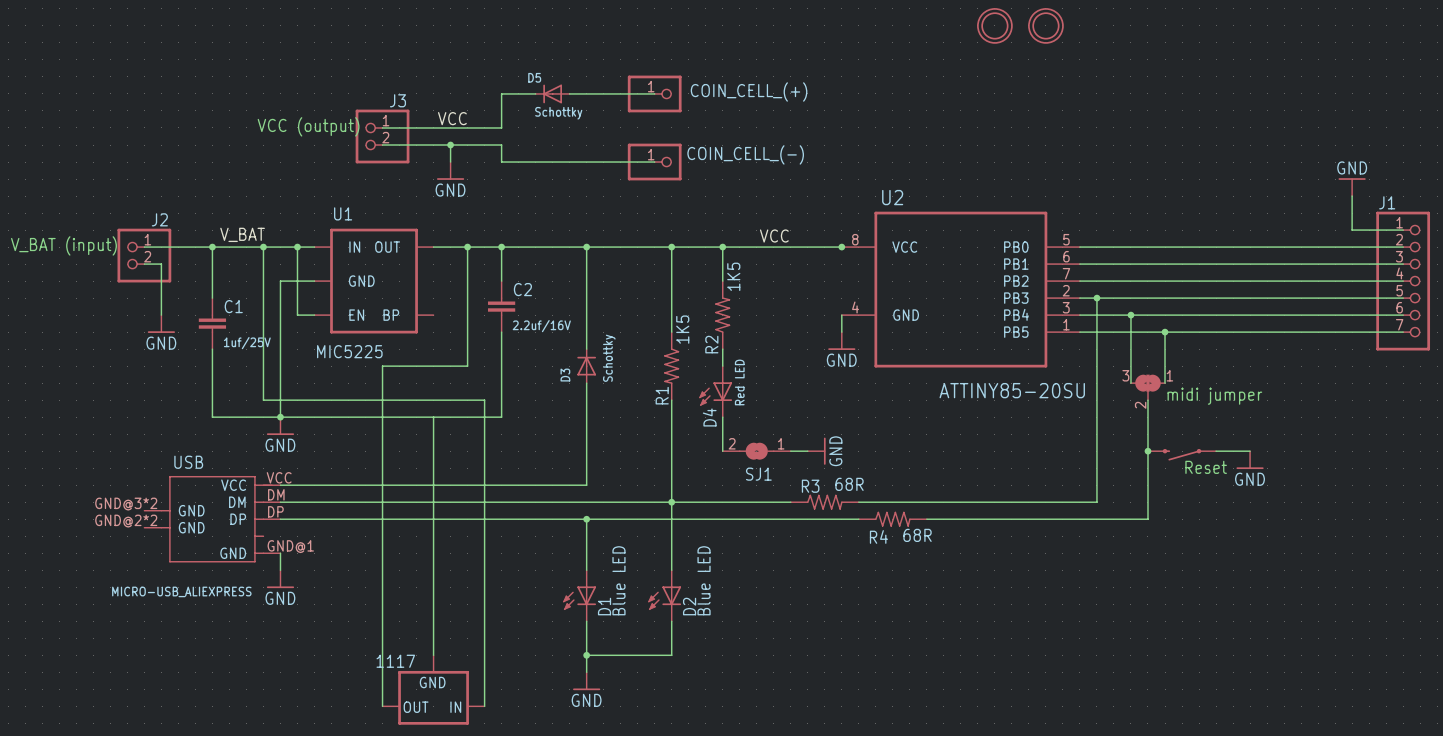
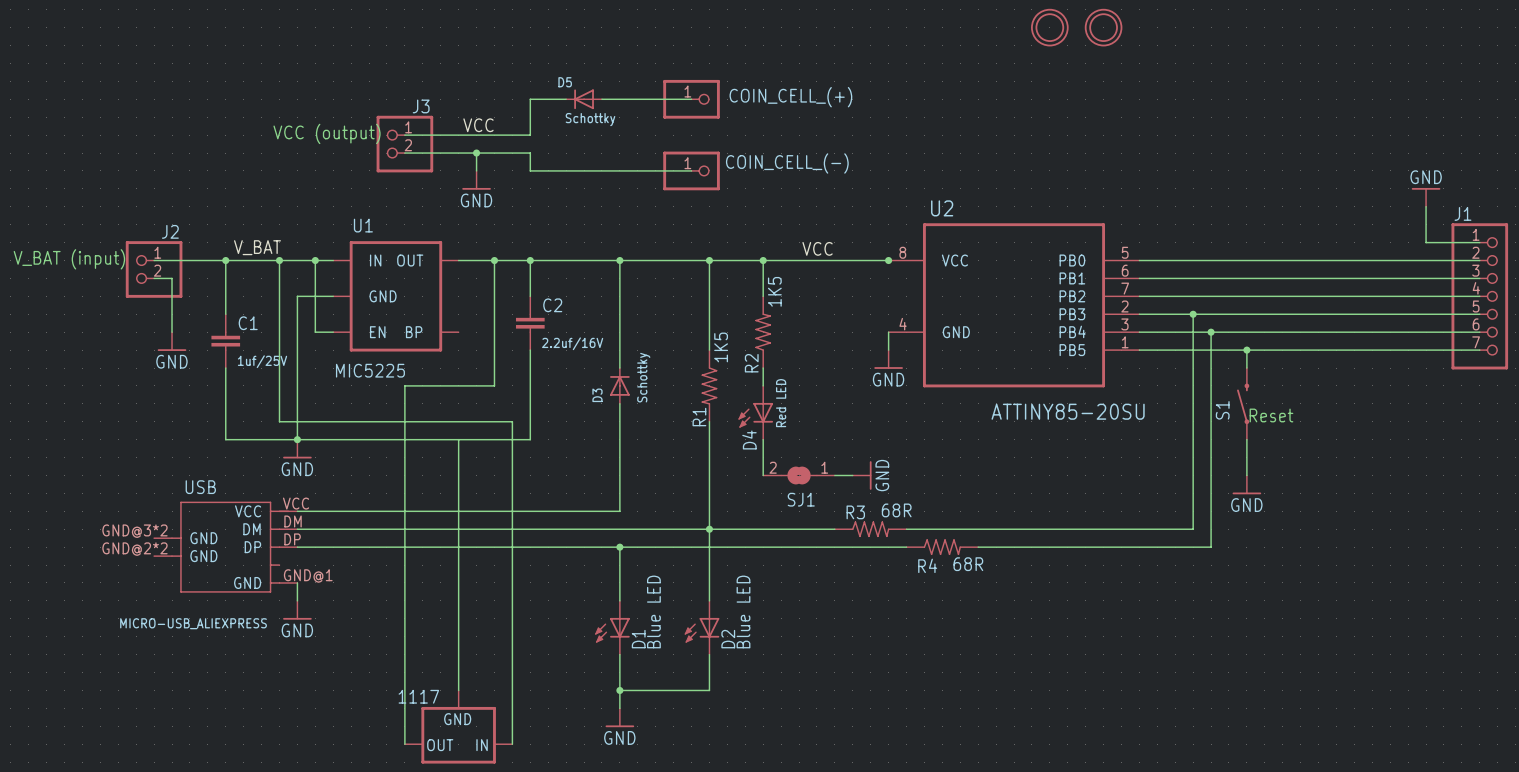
wire: (1096, 298) (1096, 502) -> (1193, 403) (1193, 529) (1157, 529)
junction: (1096, 298) -> none
wire: none -> (1193, 314) (1193, 332)
junction: none -> (1193, 314)
junction: (1130, 315) -> none
wire: none -> (1211, 332) (1211, 421)
junction: none -> (1211, 332)
wire: (1165, 332) (1165, 383) -> none
junction: (1165, 332) -> none
wire: none -> (1246, 350) (1246, 368)
junction: none -> (1246, 350)
S1: none -> (1243, 403)
part: (1147, 387) -> none
text: midi jumper (1214, 396) -> none
wire: none -> (1246, 439) (1246, 475)
junction: (1147, 451) -> none
wire: (1216, 451) (1250, 451) -> none
part: (1182, 454) -> none
power symbol position: GND (1250, 460) -> GND (1246, 484)
text position: Reset (1206, 467) -> Reset (1271, 415)

